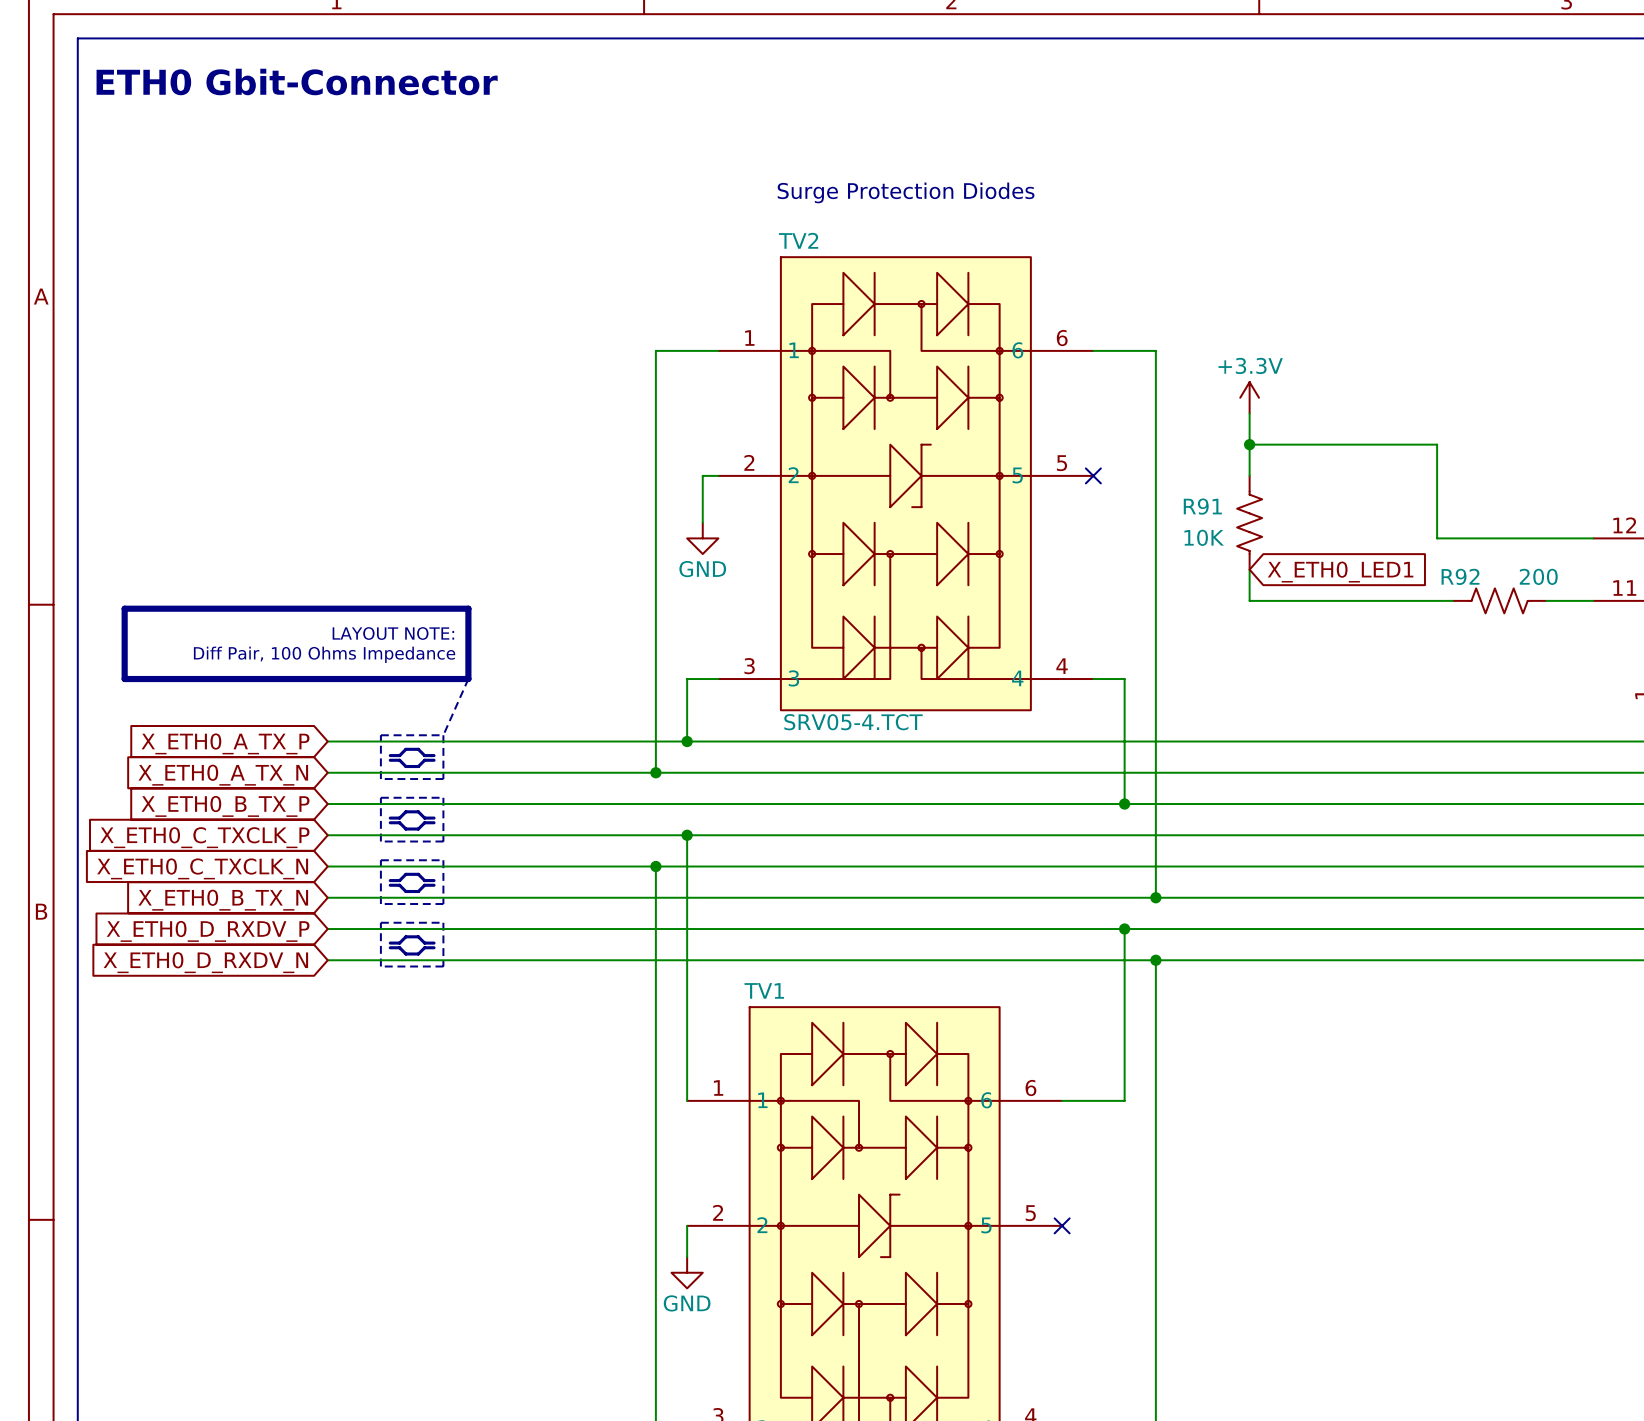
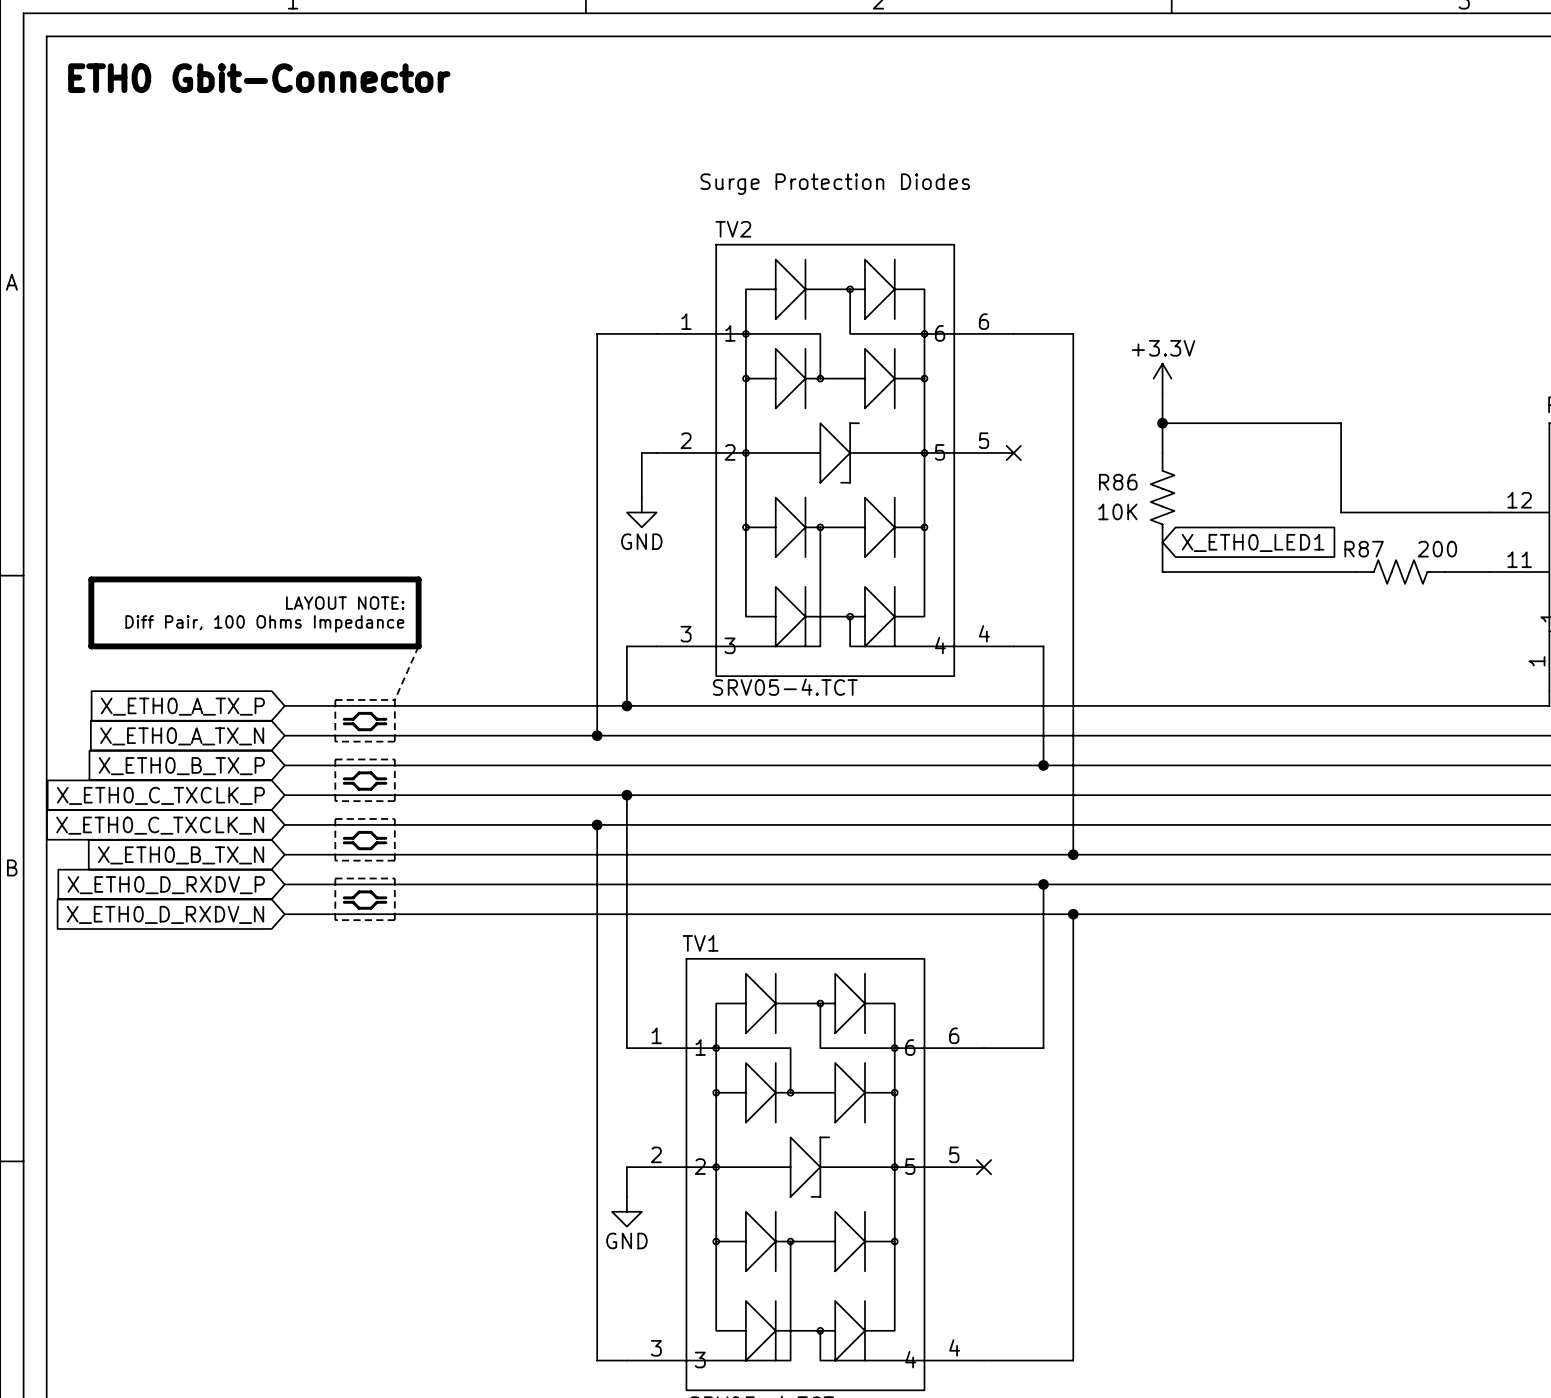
R91 name: R91 (1202, 506) -> R86 (1118, 482)
R92 name: R92 (1460, 576) -> R87 (1364, 549)

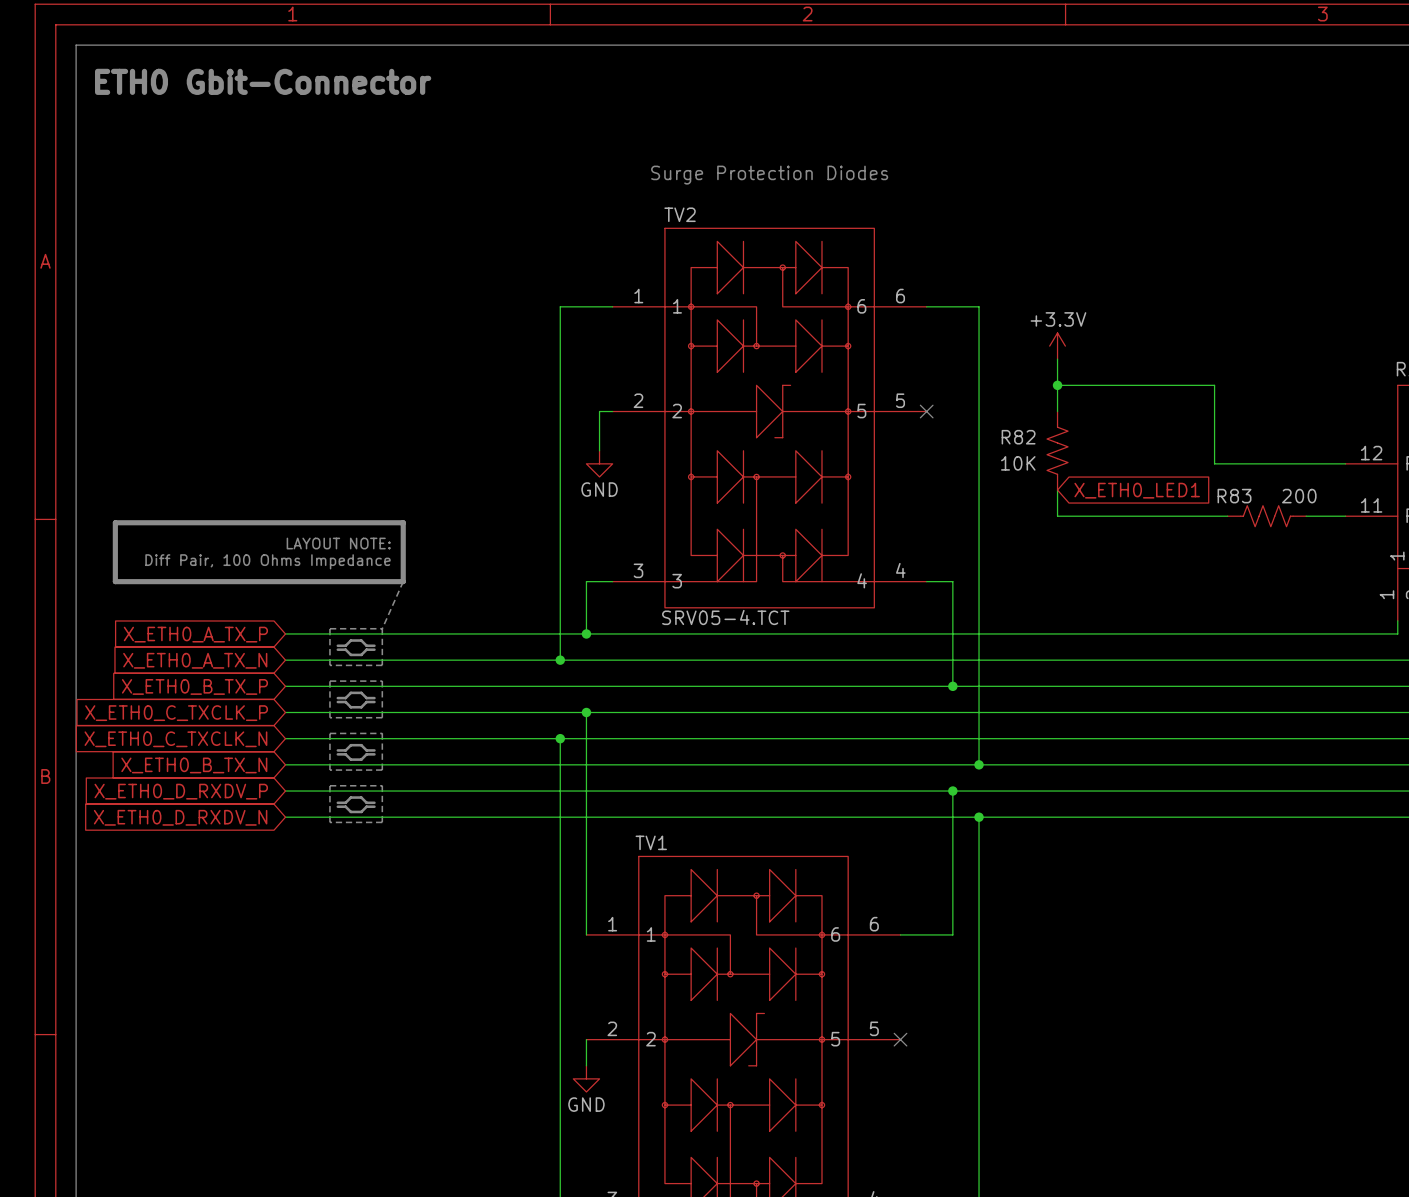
R86 name: R86 (1118, 482) -> R82 (1018, 437)
R87 name: R87 (1364, 549) -> R83 (1234, 496)

